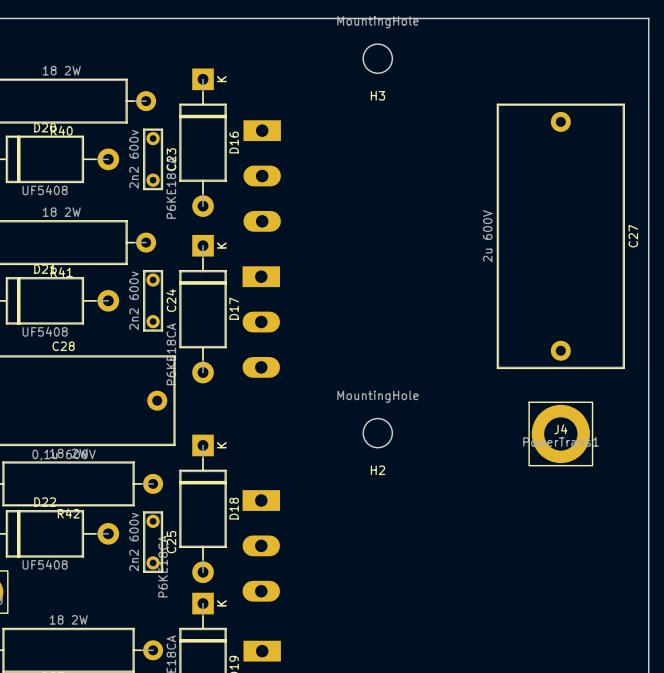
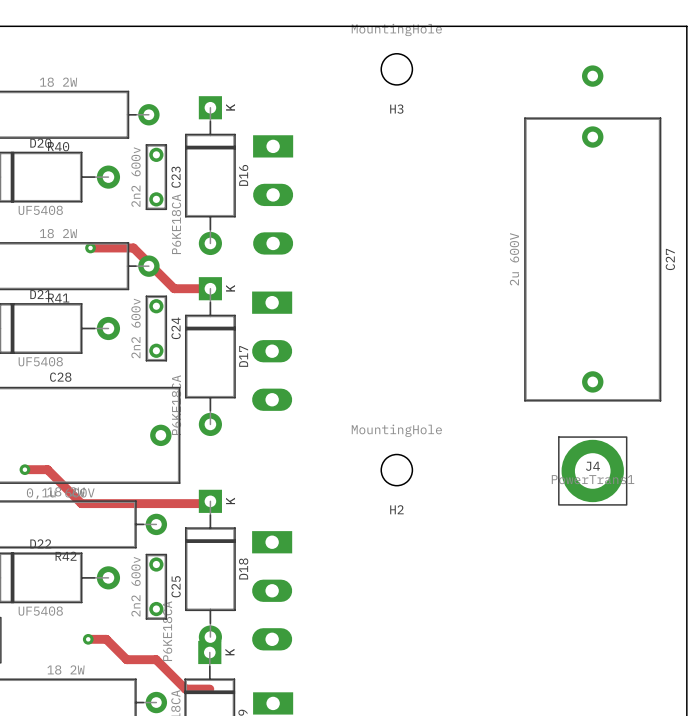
part: none -> (592, 76)
D16 position: (203, 142) -> (210, 175)
track: none -> (90, 247) (133, 247) (174, 288) (210, 288)
via: none -> (90, 247)
D17 position: (203, 309) -> (210, 356)
track: none -> (24, 469) (47, 469) (81, 503) (208, 503) (210, 501)
via: none -> (24, 469)
D18 position: (203, 508) -> (210, 569)
track: none -> (88, 639) (106, 639) (126, 659) (156, 659) (185, 689) (209, 689)
via: none -> (88, 639)

